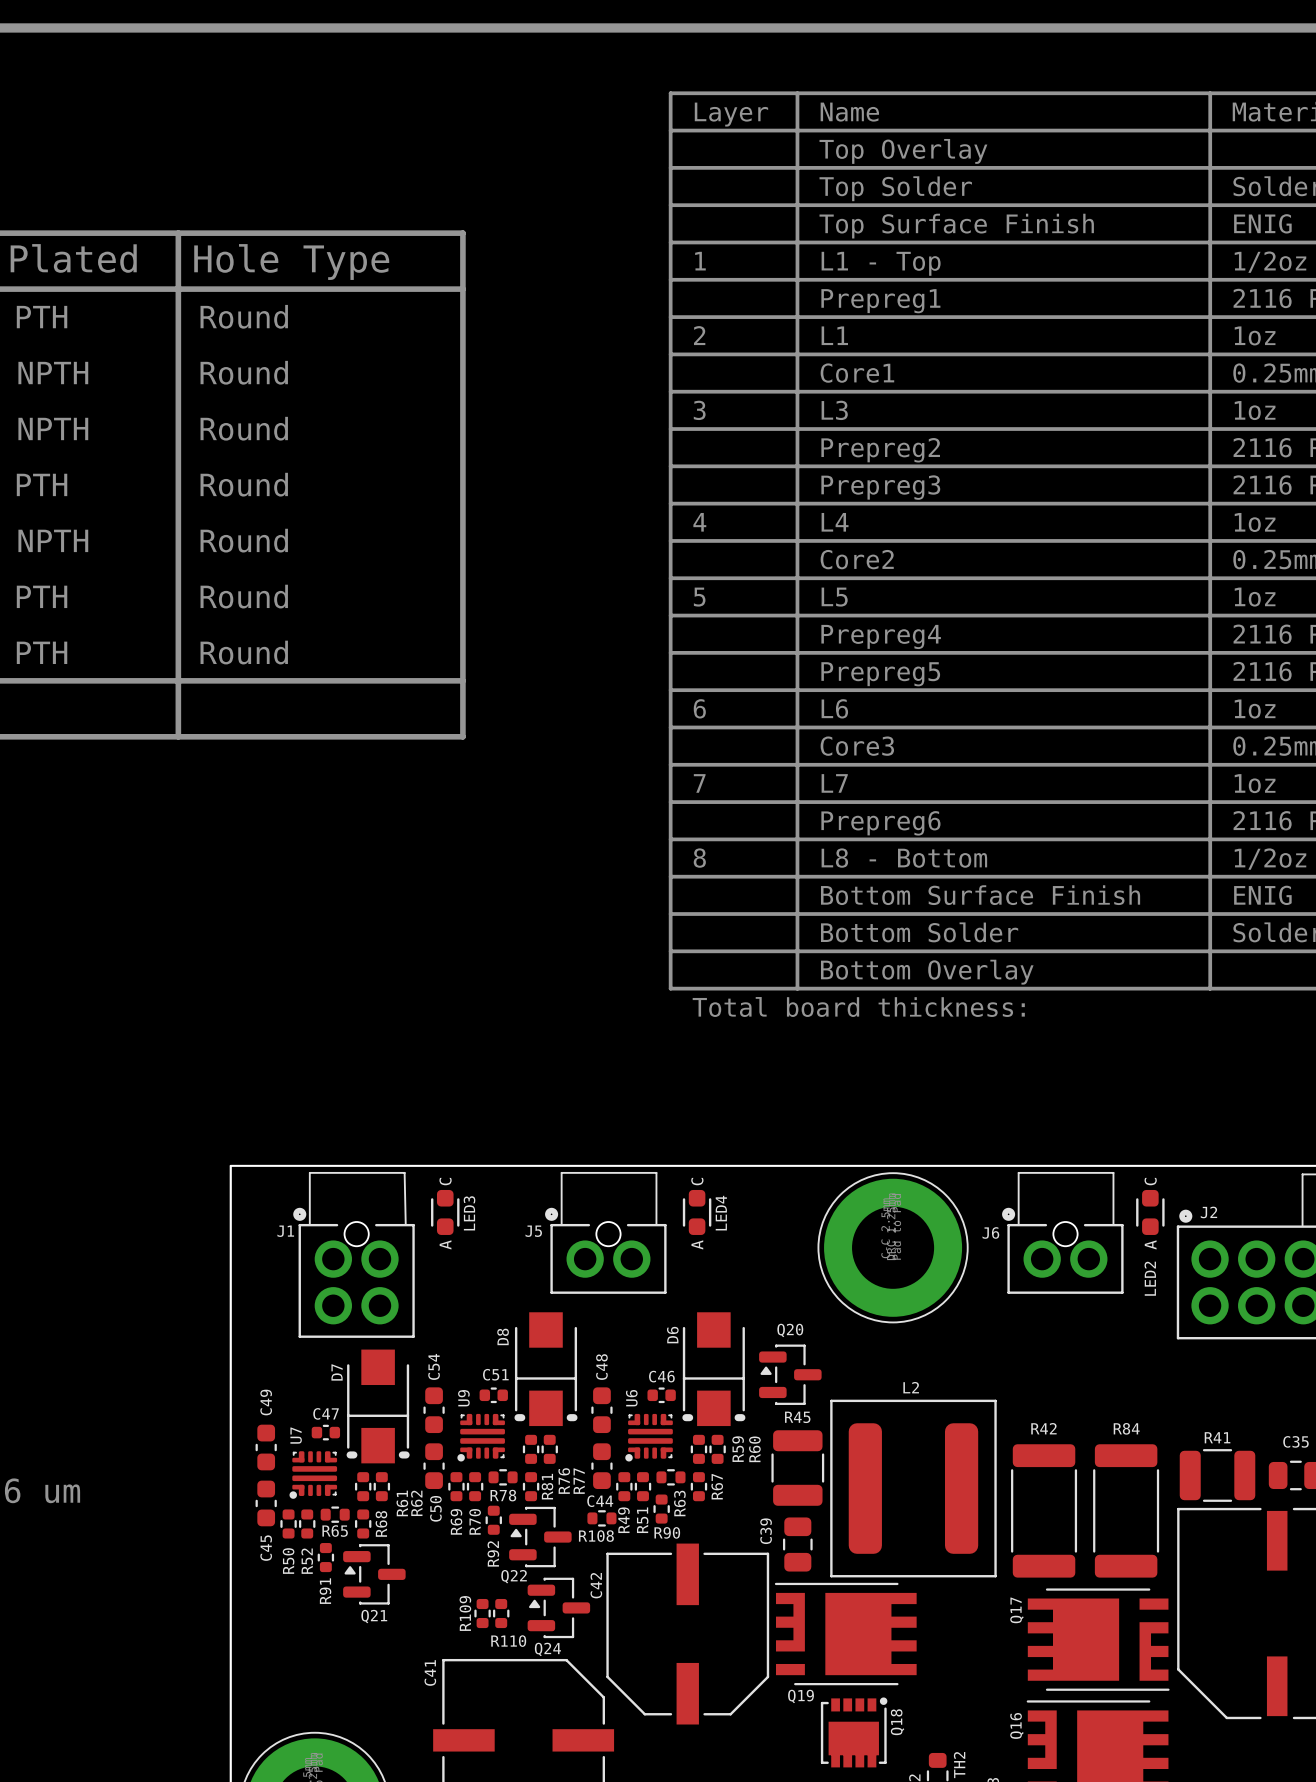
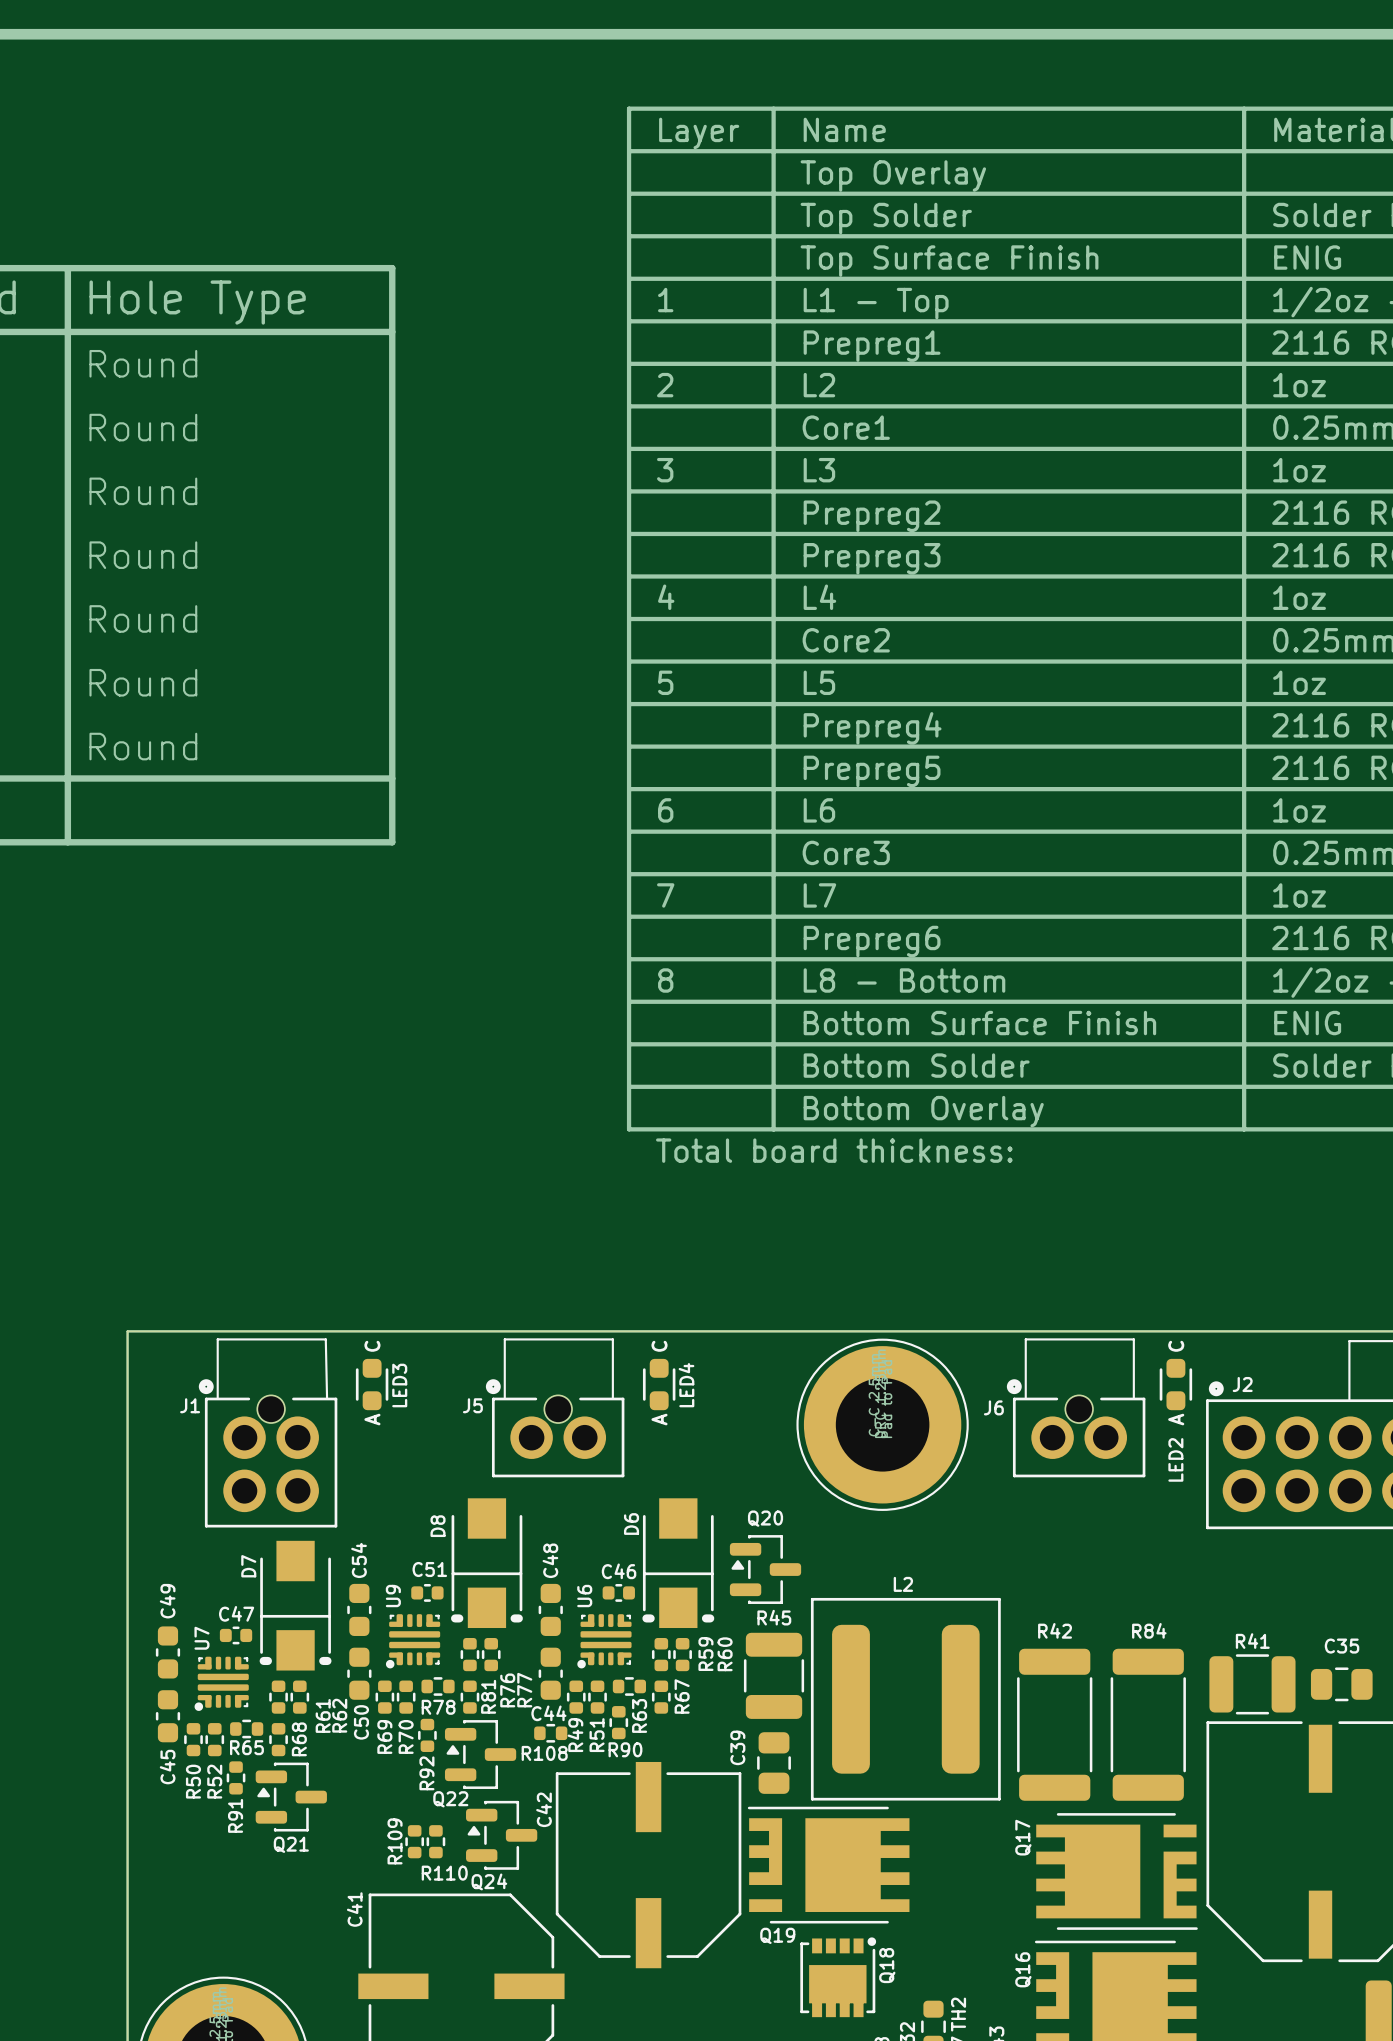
text: L1 (834, 335) -> L2 (819, 385)

